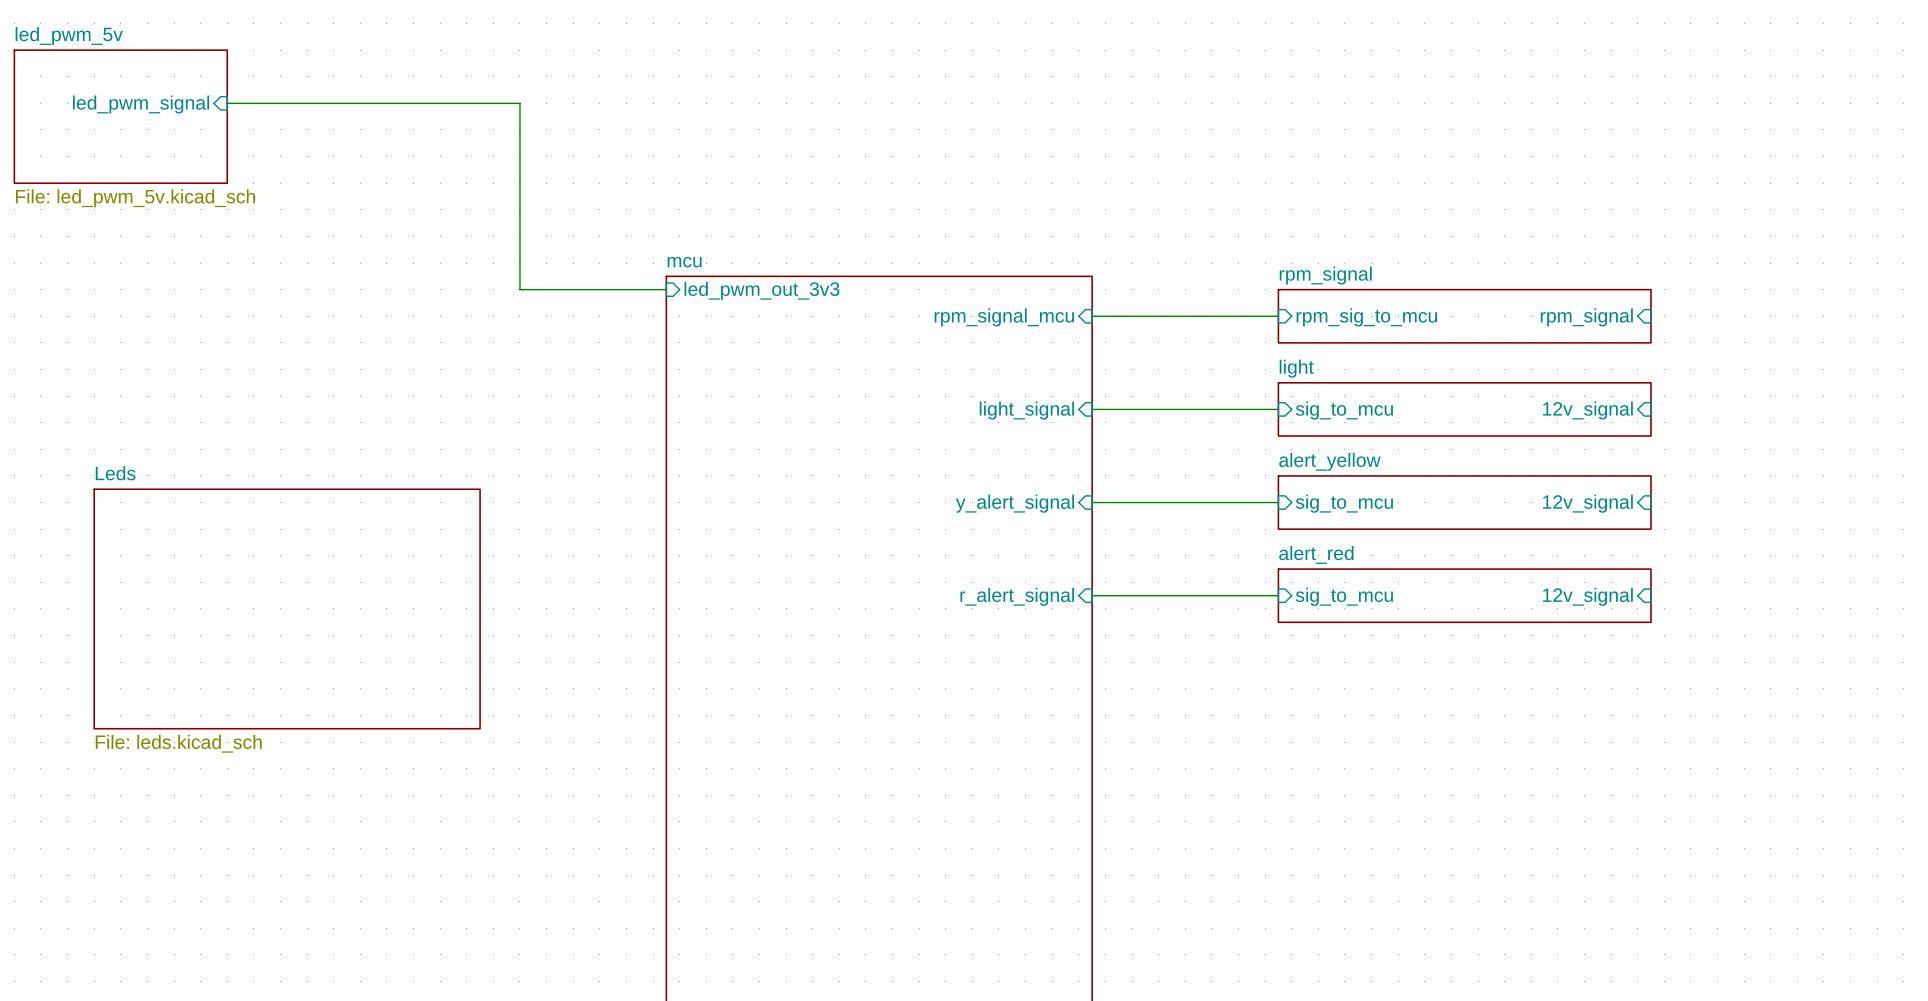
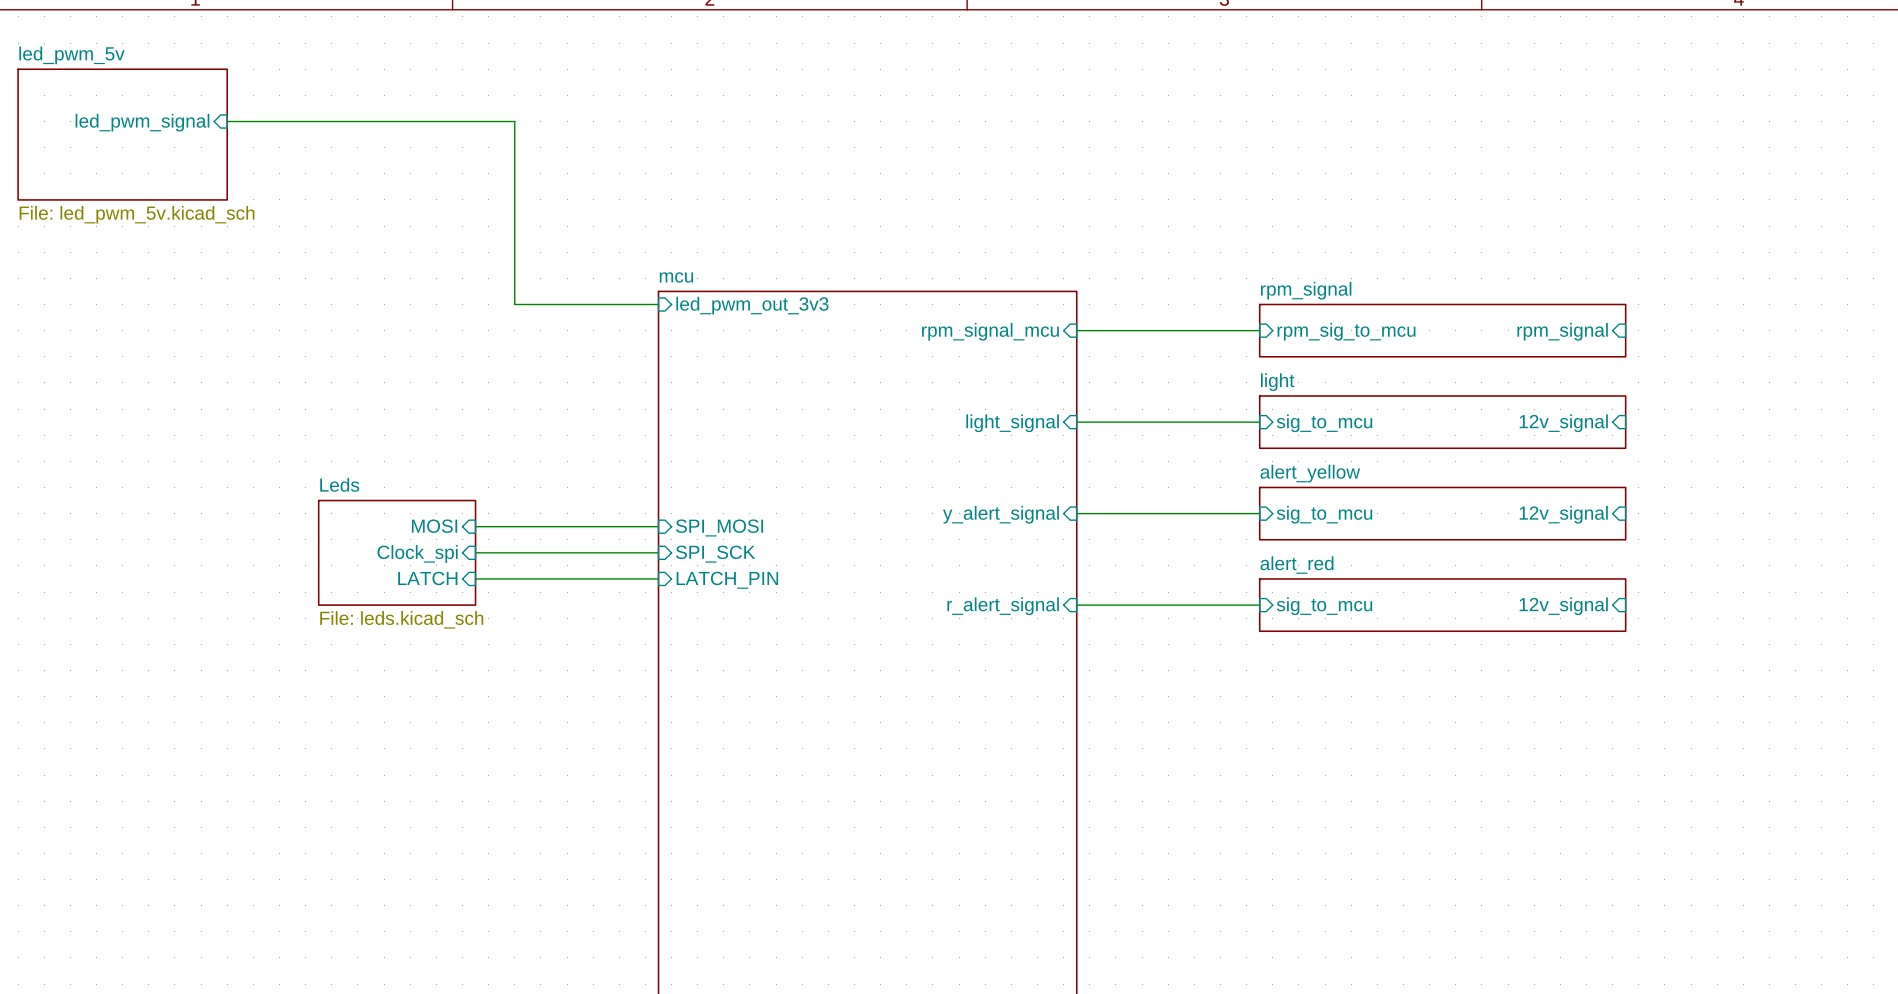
sheet pin: none -> MOSI (434, 526)
wire: none -> (475, 526) (658, 526)
sheet pin: none -> SPI_MOSI (719, 527)
sheet Leds: none -> File: leds.kicad_sch (397, 552)
wire: none -> (475, 552) (658, 552)
sheet pin: none -> Clock_spi (417, 553)
sheet pin: none -> SPI_SCK (715, 554)
sheet pin: none -> LATCH (427, 578)
wire: none -> (475, 578) (658, 578)
sheet pin: none -> LATCH_PIN (727, 580)
sheet Leds: File: leds.kicad_sch (287, 608) -> none

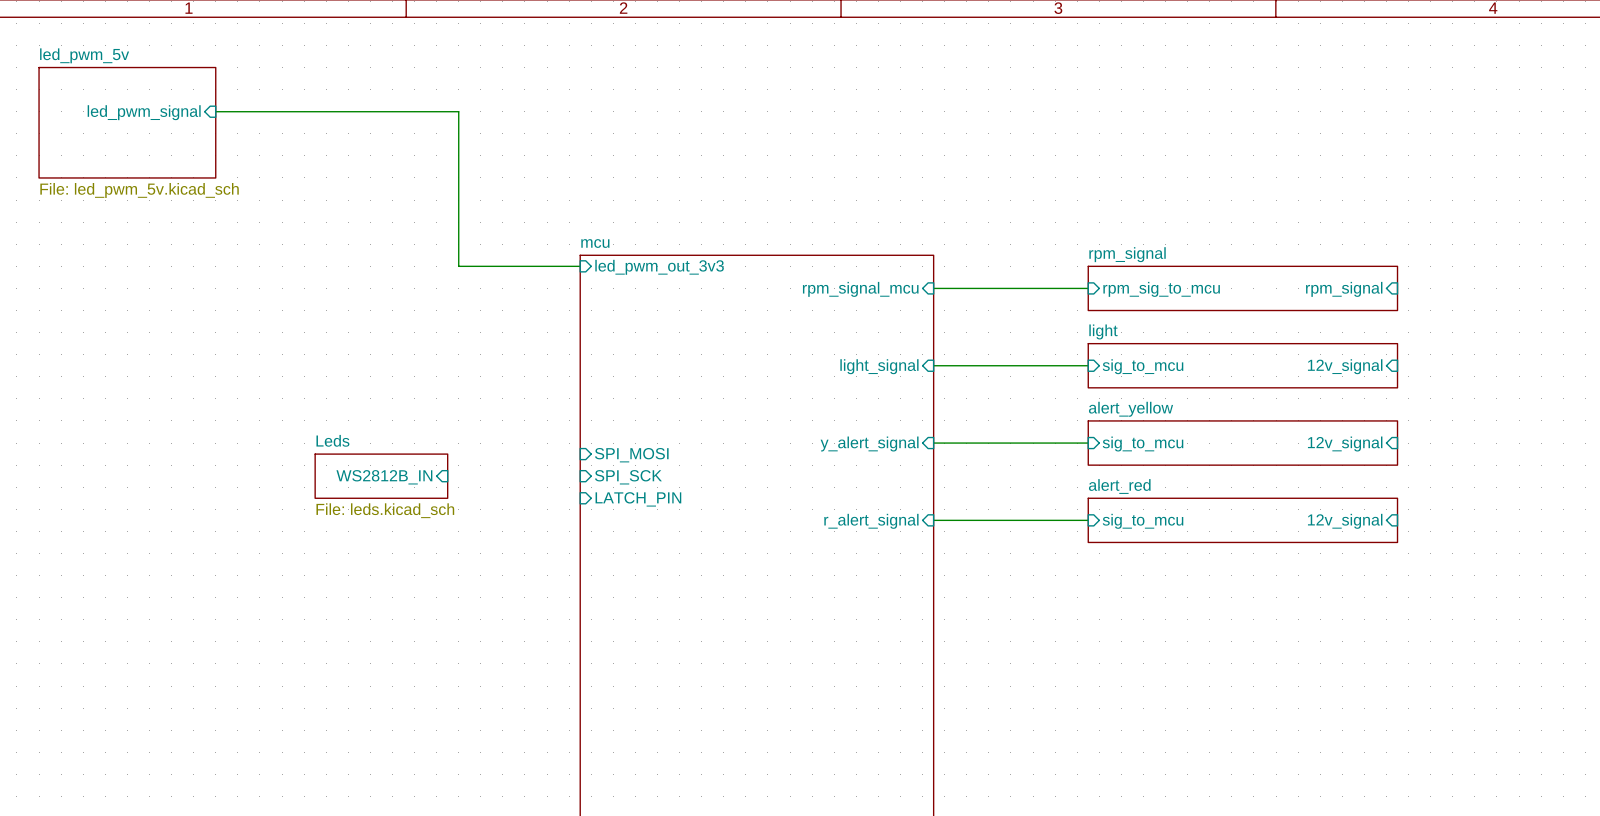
sheet pin: MOSI (434, 526) -> none
wire: (475, 526) (658, 526) -> none
sheet Leds: File: leds.kicad_sch (397, 552) -> none
sheet Leds: none -> File: leds.kicad_sch (381, 476)
wire: (475, 552) (658, 552) -> none
sheet pin: Clock_spi (417, 553) -> none
sheet pin: none -> WS2812B_IN (384, 477)
sheet pin: LATCH (427, 578) -> none
wire: (475, 578) (658, 578) -> none

